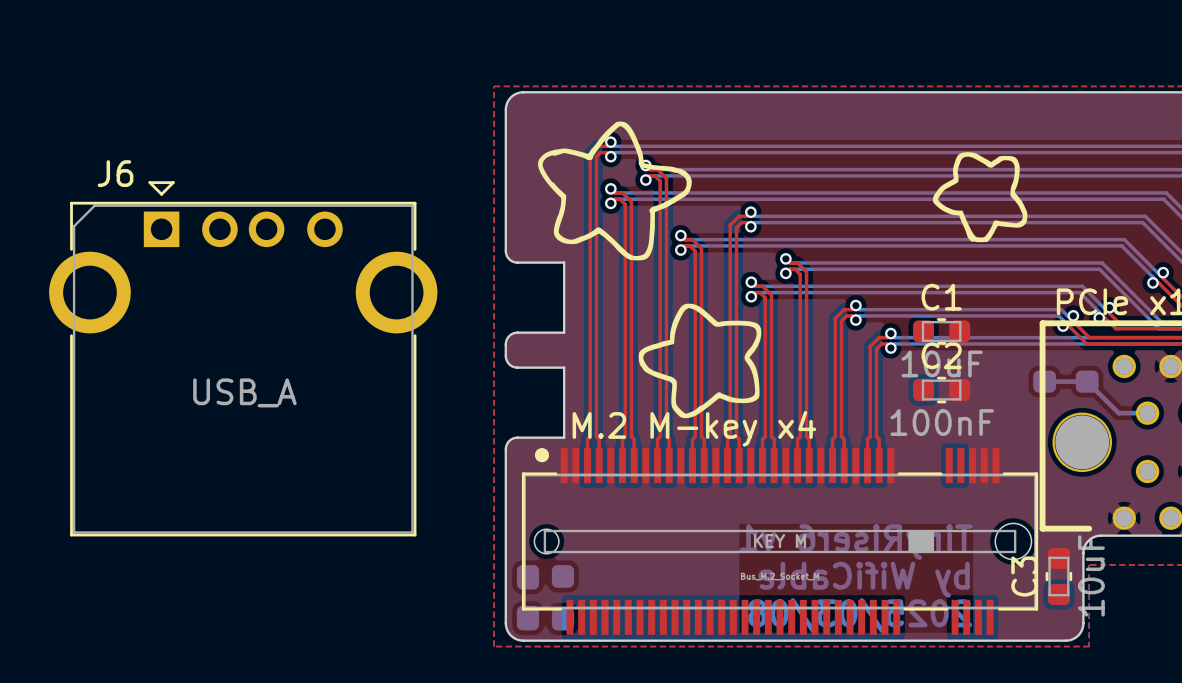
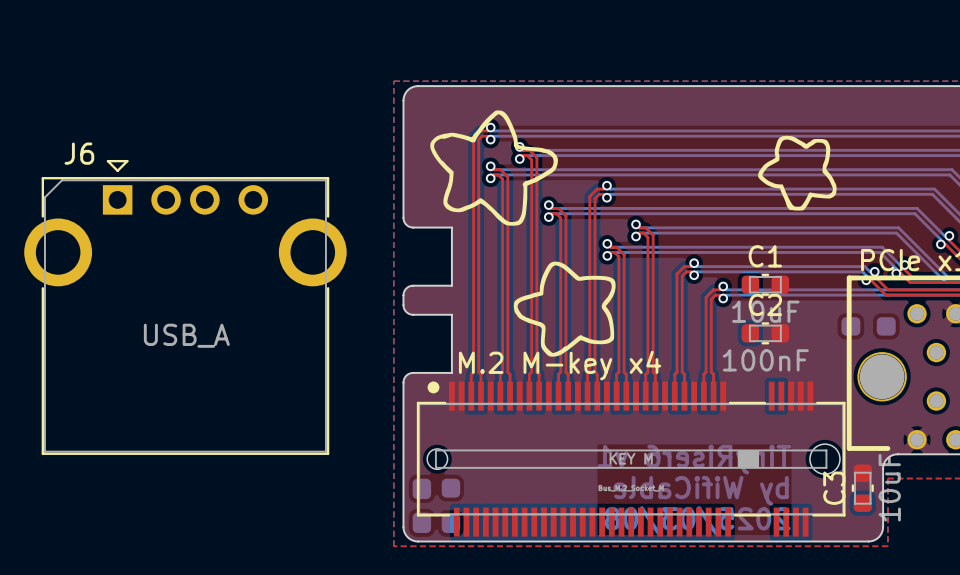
bottom track: (1044, 381) (1087, 381) -> none
bottom track: (1087, 381) (1118, 413) (1147, 413) -> none

